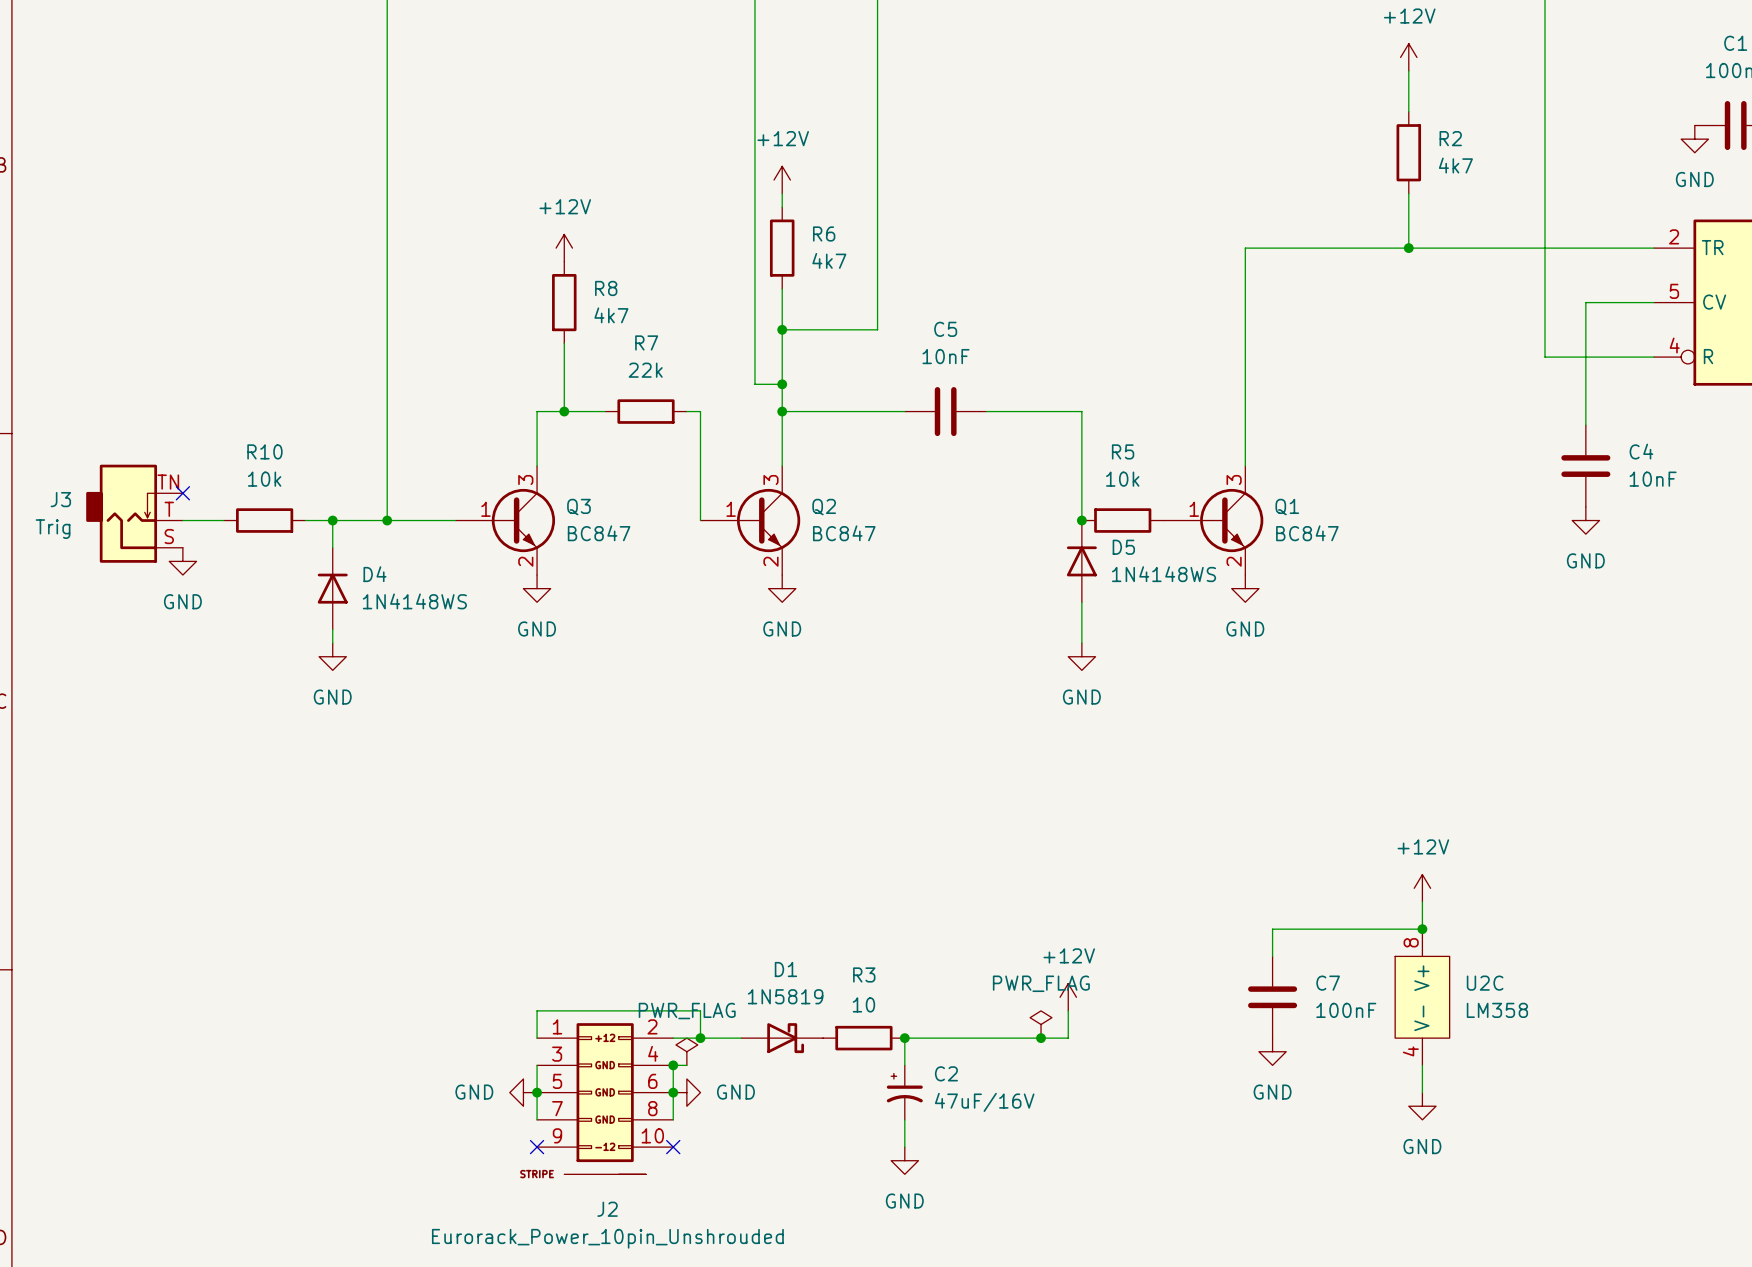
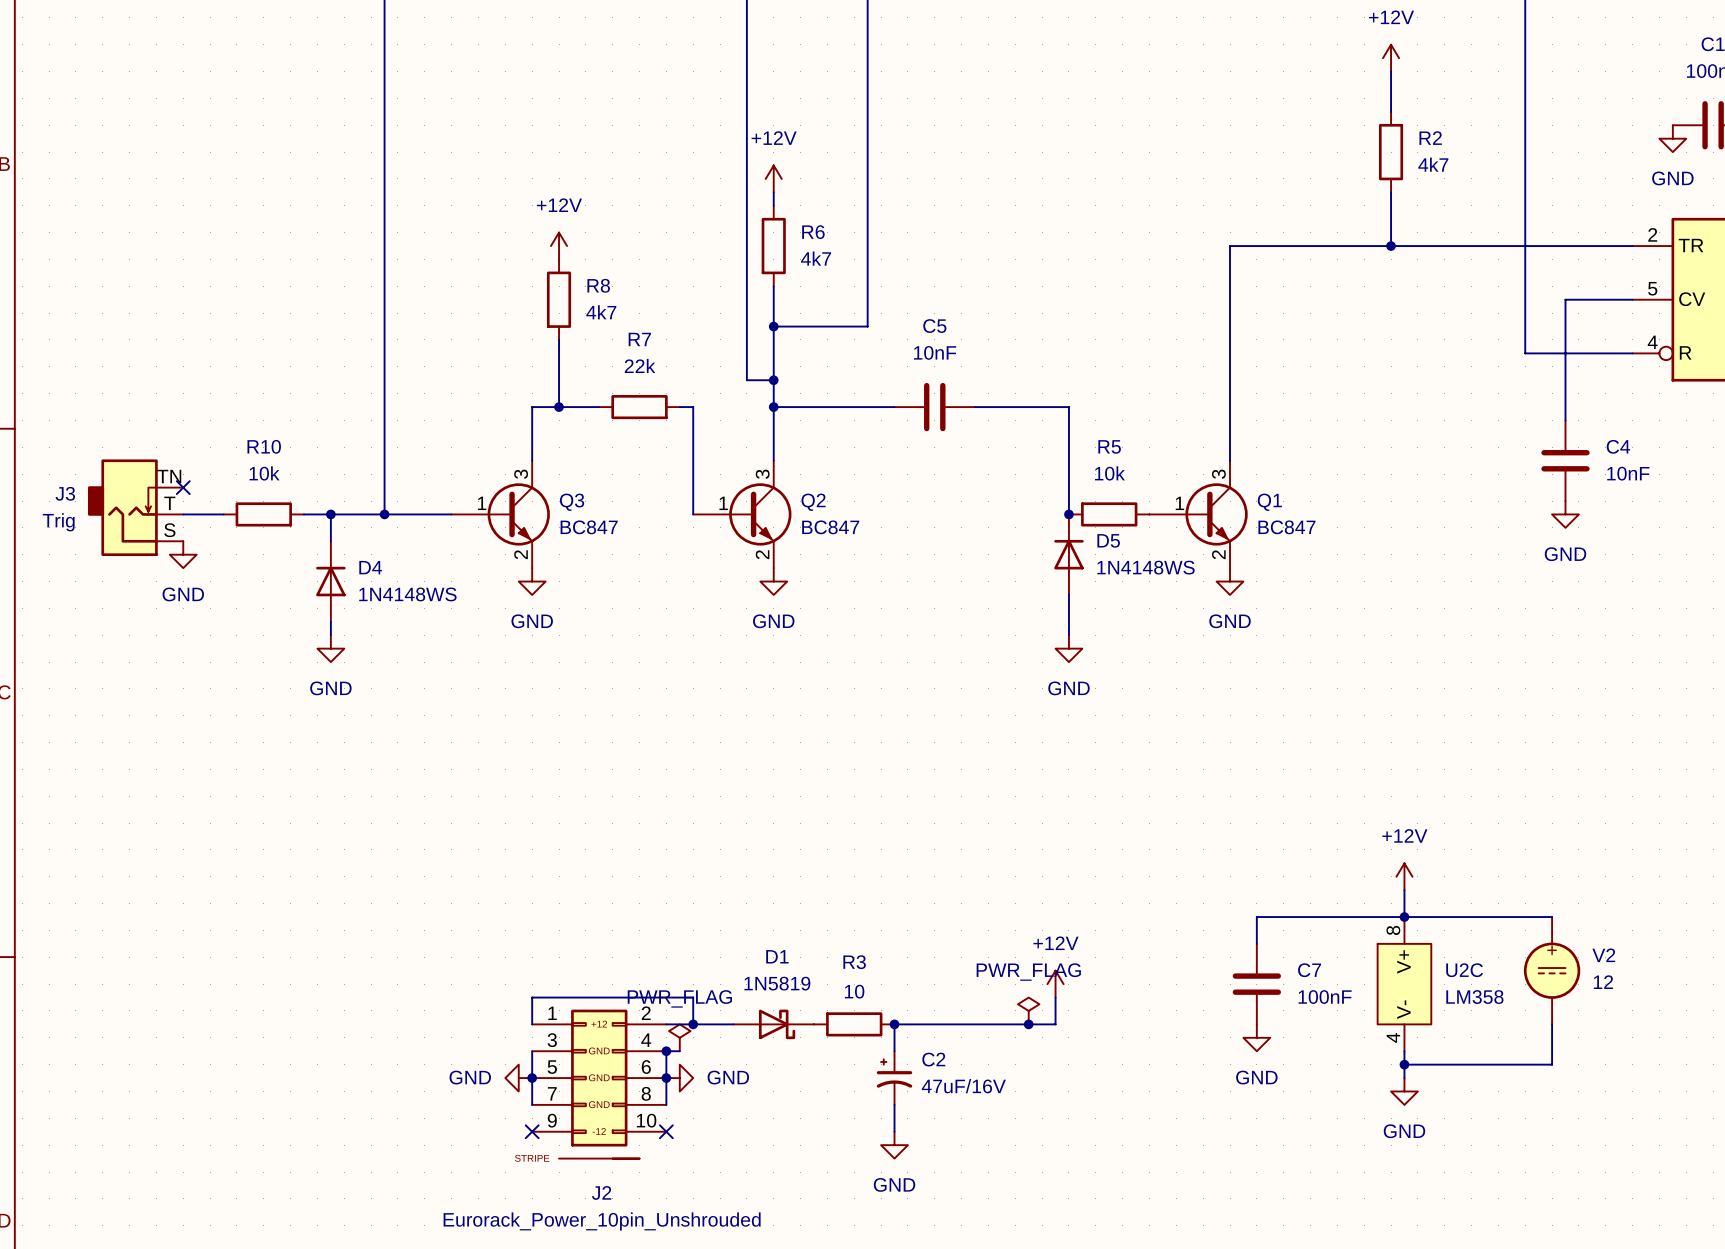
wire: none -> (1404, 917) (1552, 917)
V2: none -> 12 (1552, 970)
wire: none -> (1552, 1024) (1552, 1064) (1404, 1064)
junction: none -> (1404, 1064)

